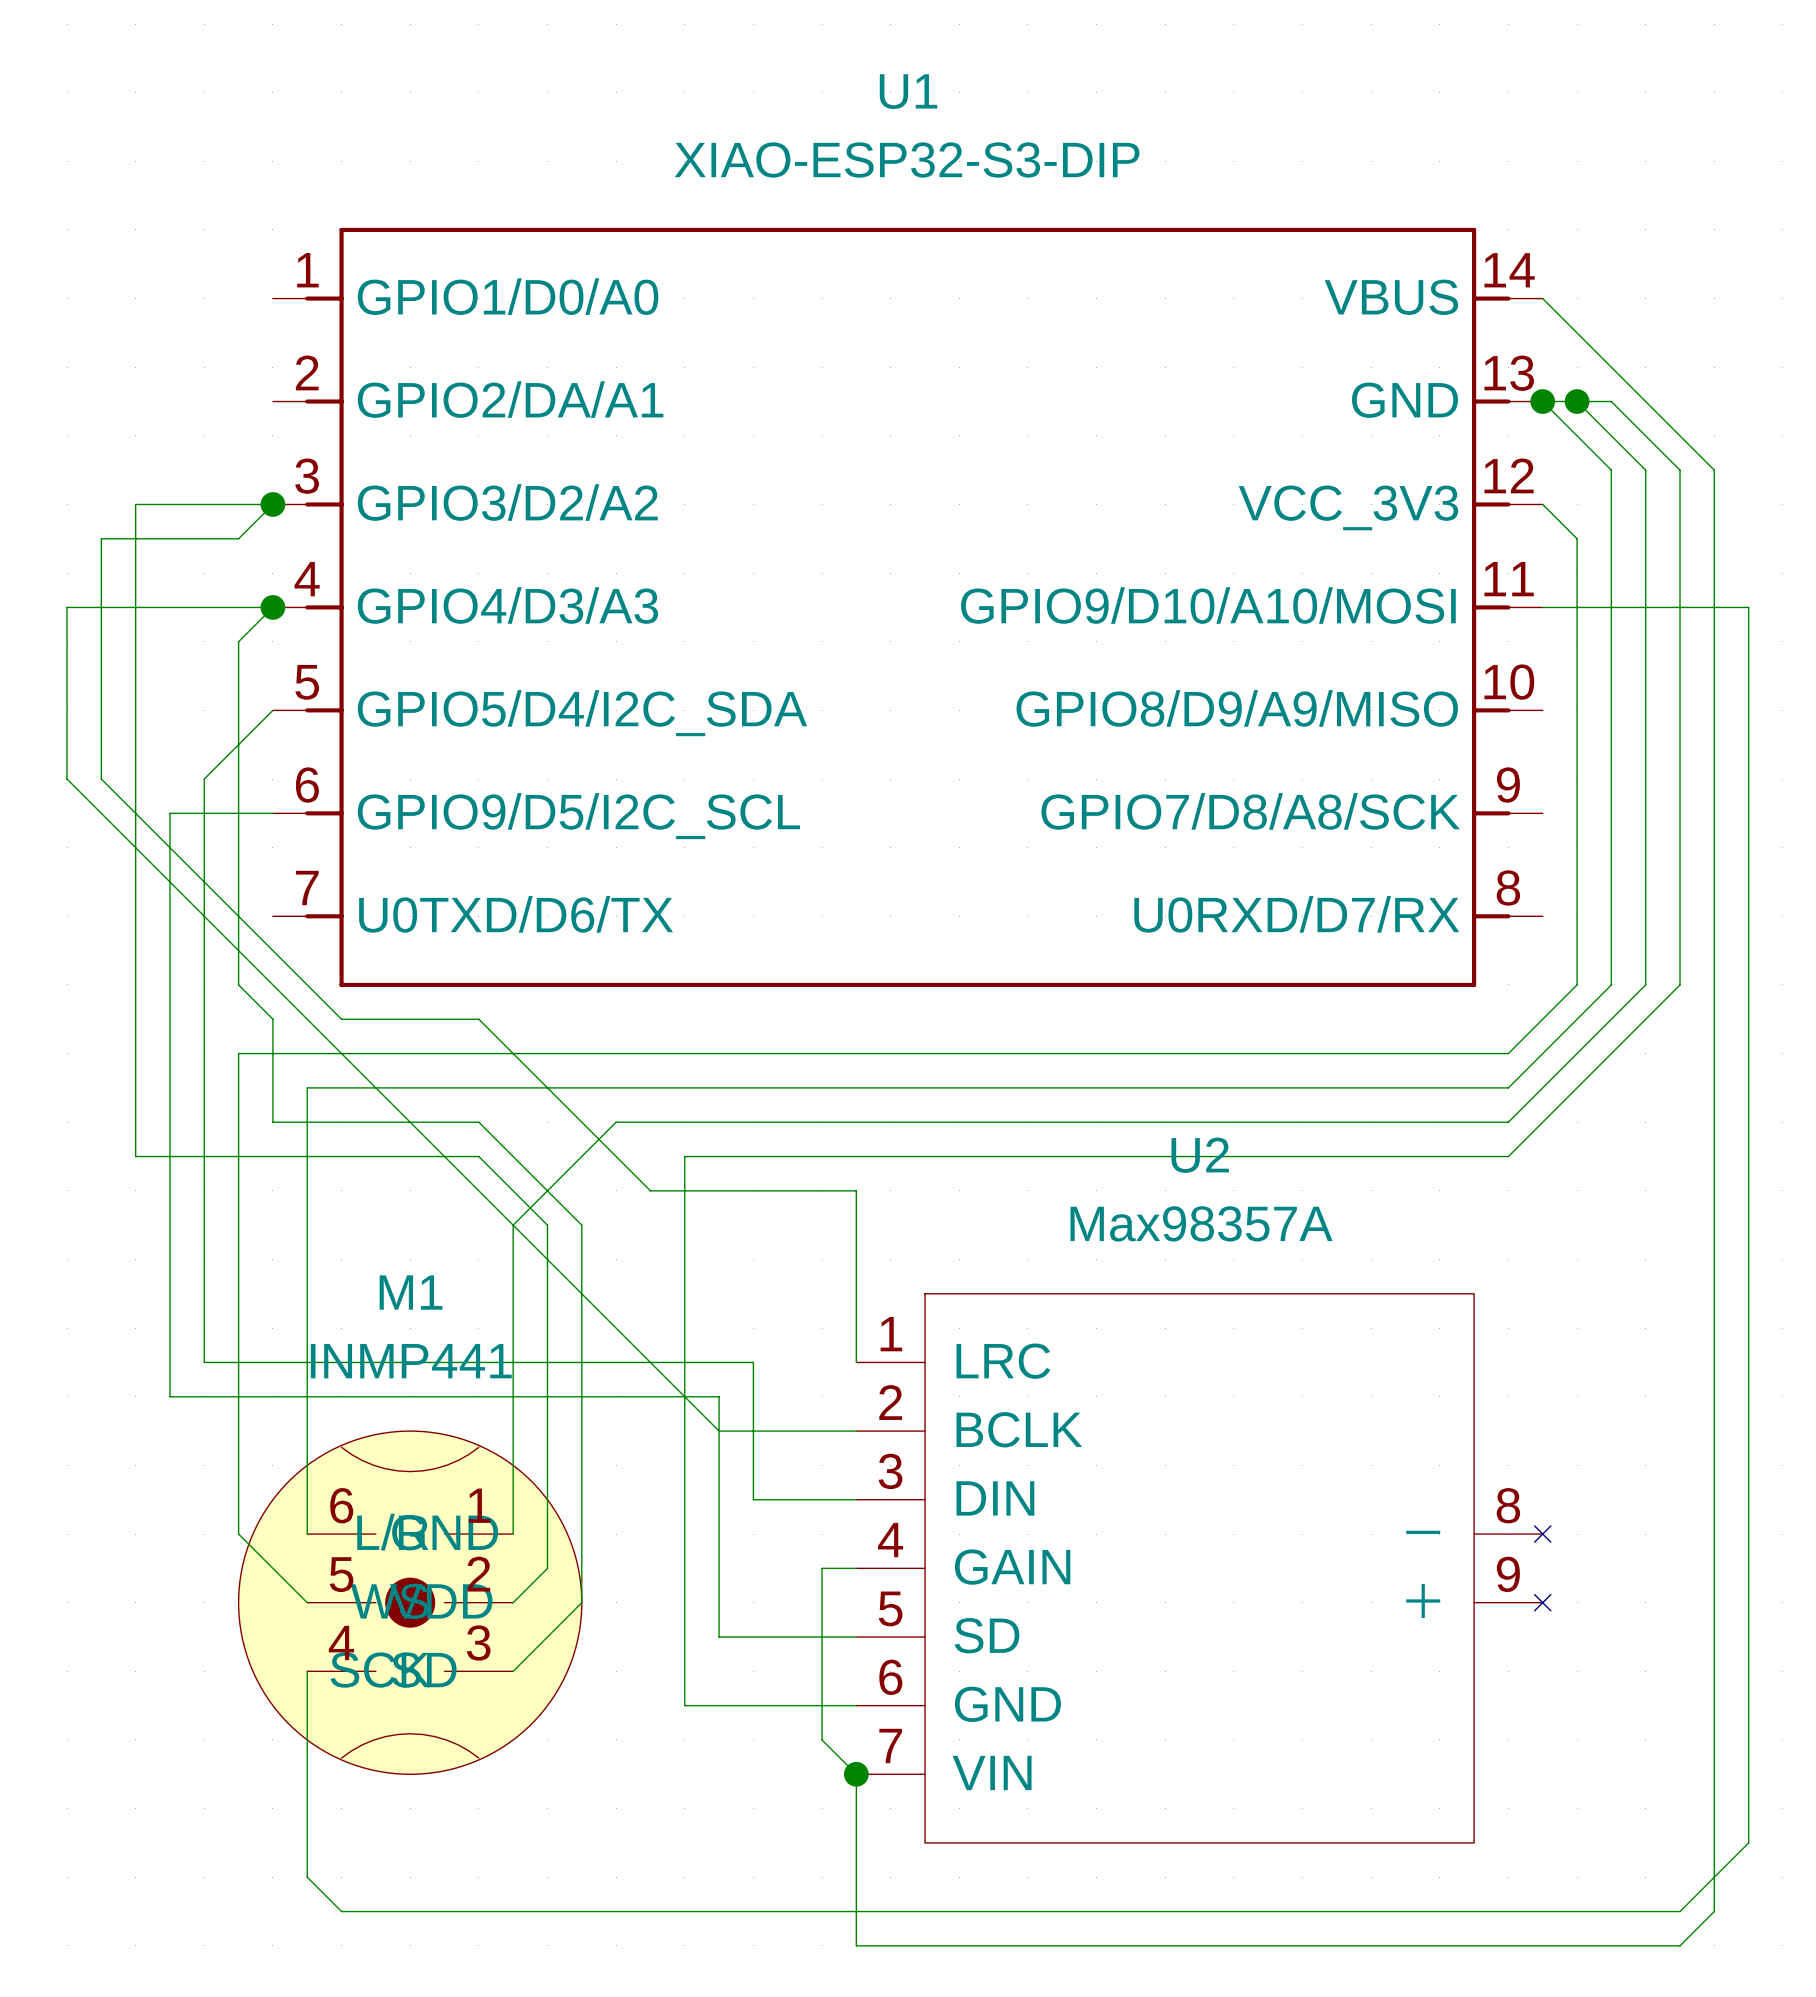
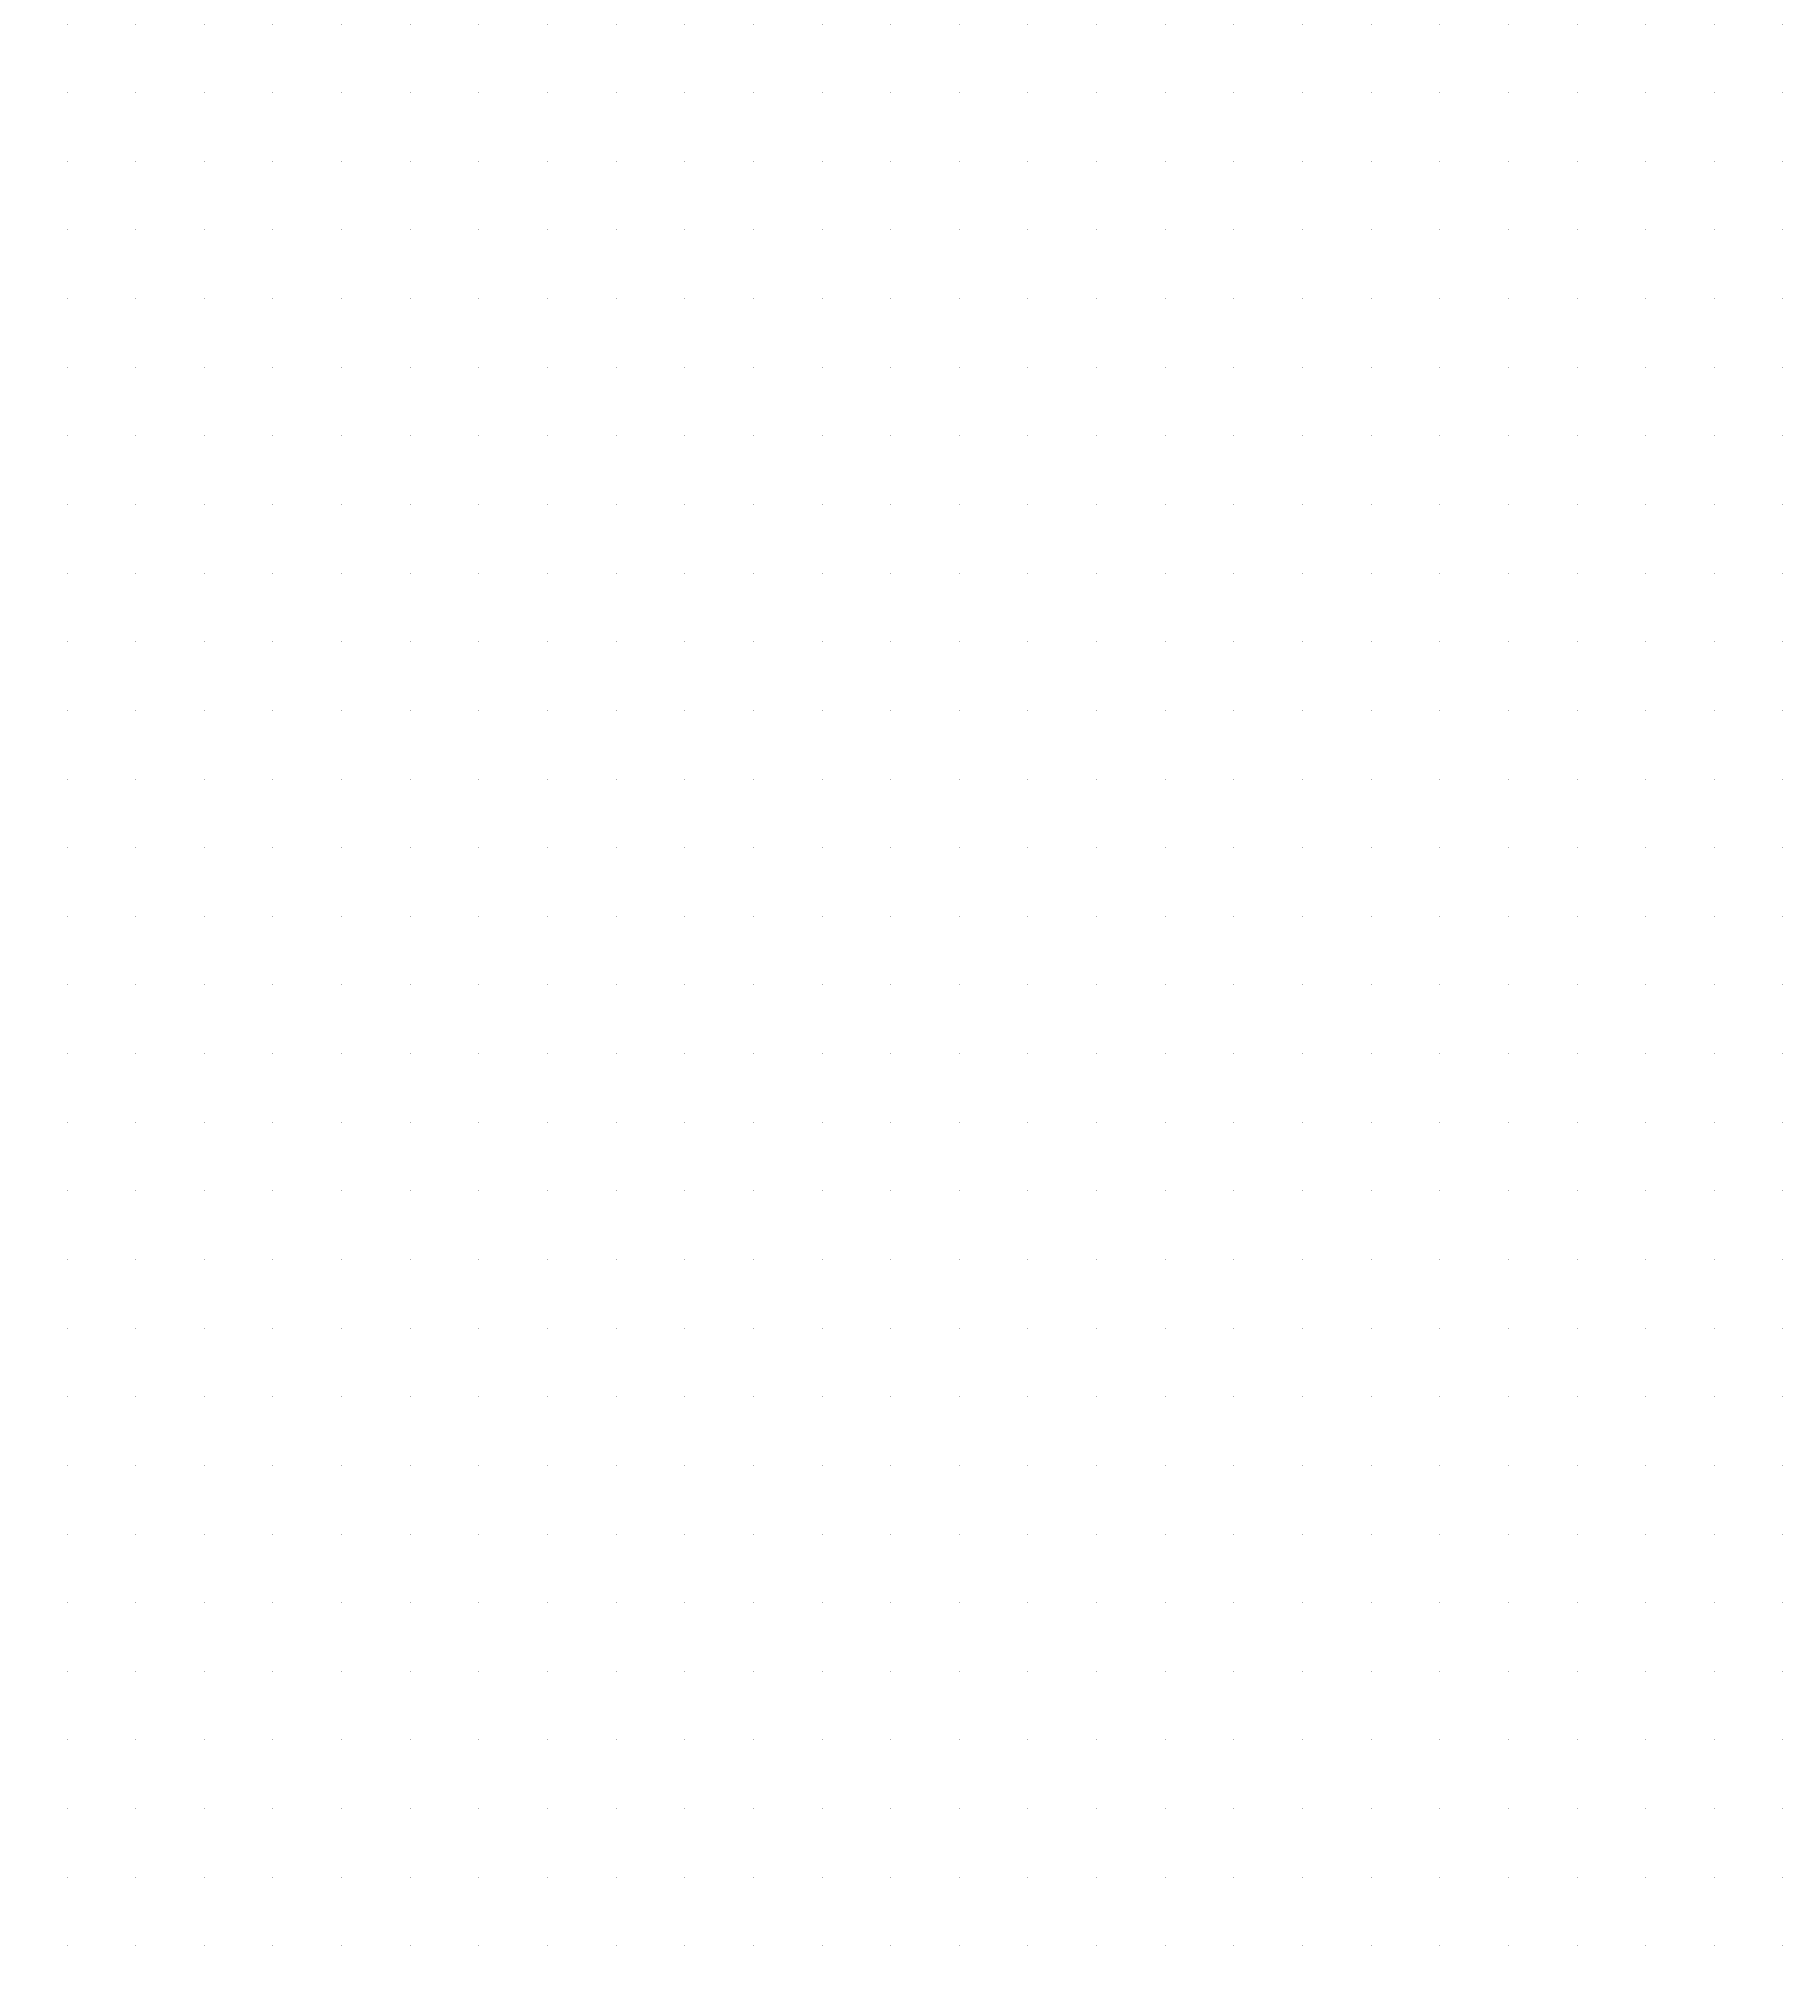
wire: (1542, 298) (1714, 470) (1714, 1911) (1680, 1945) (856, 1945) (856, 1774) (822, 1739) (822, 1568) (856, 1568) -> none
junction: (1542, 401) -> none
wire: (1577, 401) (1645, 470) (1645, 984) (1508, 1122) (616, 1122) (513, 1225) (513, 1534) -> none
junction: (1577, 401) -> none
junction: (272, 504) -> none
wire: (1542, 504) (1577, 538) (1577, 984) (1508, 1053) (238, 1053) (238, 1534) (307, 1602) -> none
junction: (272, 607) -> none
U1: XIAO-ESP32-S3-DIP (907, 607) -> none
wire: (1542, 607) (1748, 607) (1748, 1842) (1680, 1911) (341, 1911) (307, 1877) (307, 1671) -> none
wire: (272, 710) (204, 779) (204, 1362) (753, 1362) (753, 1499) (856, 1499) -> none
wire: (272, 813) (169, 813) (169, 1396) (719, 1396) (719, 1637) (856, 1637) -> none
wire: (856, 1362) (856, 1190) (650, 1190) (478, 1019) (341, 1019) (101, 779) (101, 538) (238, 538) (272, 504) (135, 504) (135, 1156) (478, 1156) (547, 1225) (547, 1568) (513, 1602) -> none
wire: (856, 1431) (719, 1431) (67, 779) (67, 607) (272, 607) (238, 641) (238, 984) (272, 1019) (272, 1122) (478, 1122) (581, 1225) (581, 1602) (513, 1671) -> none
wire: (307, 1534) (307, 1087) (1508, 1087) (1611, 984) (1611, 470) (1542, 401) (1611, 401) (1680, 470) (1680, 984) (1508, 1156) (684, 1156) (684, 1705) (856, 1705) -> none
U2: Max98357A (1203, 1568) -> none
M1: INMP441 (410, 1602) -> none
junction: (856, 1774) -> none

